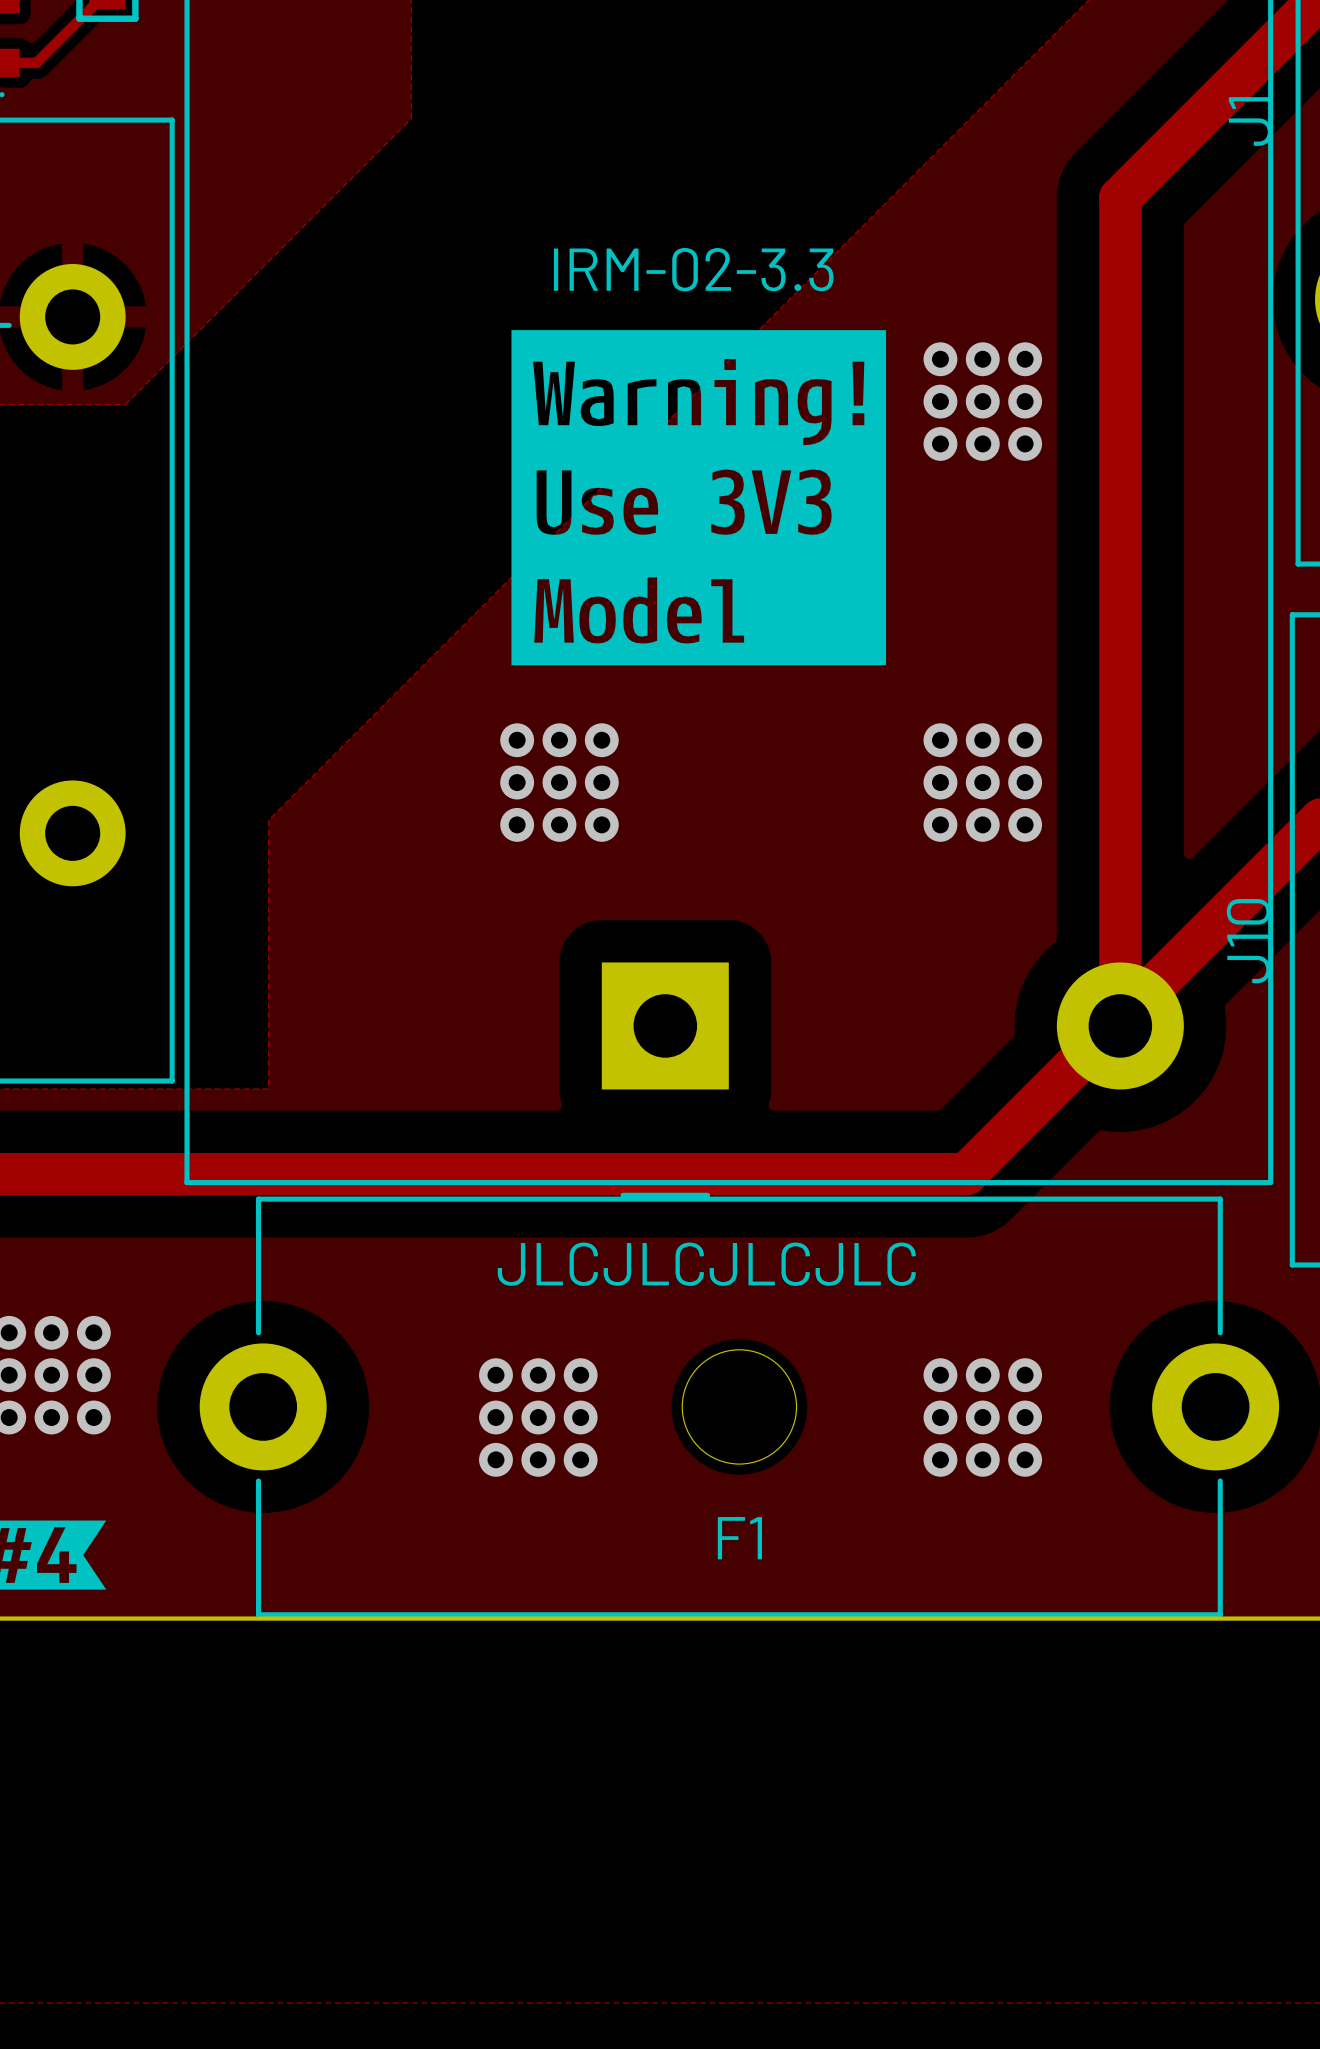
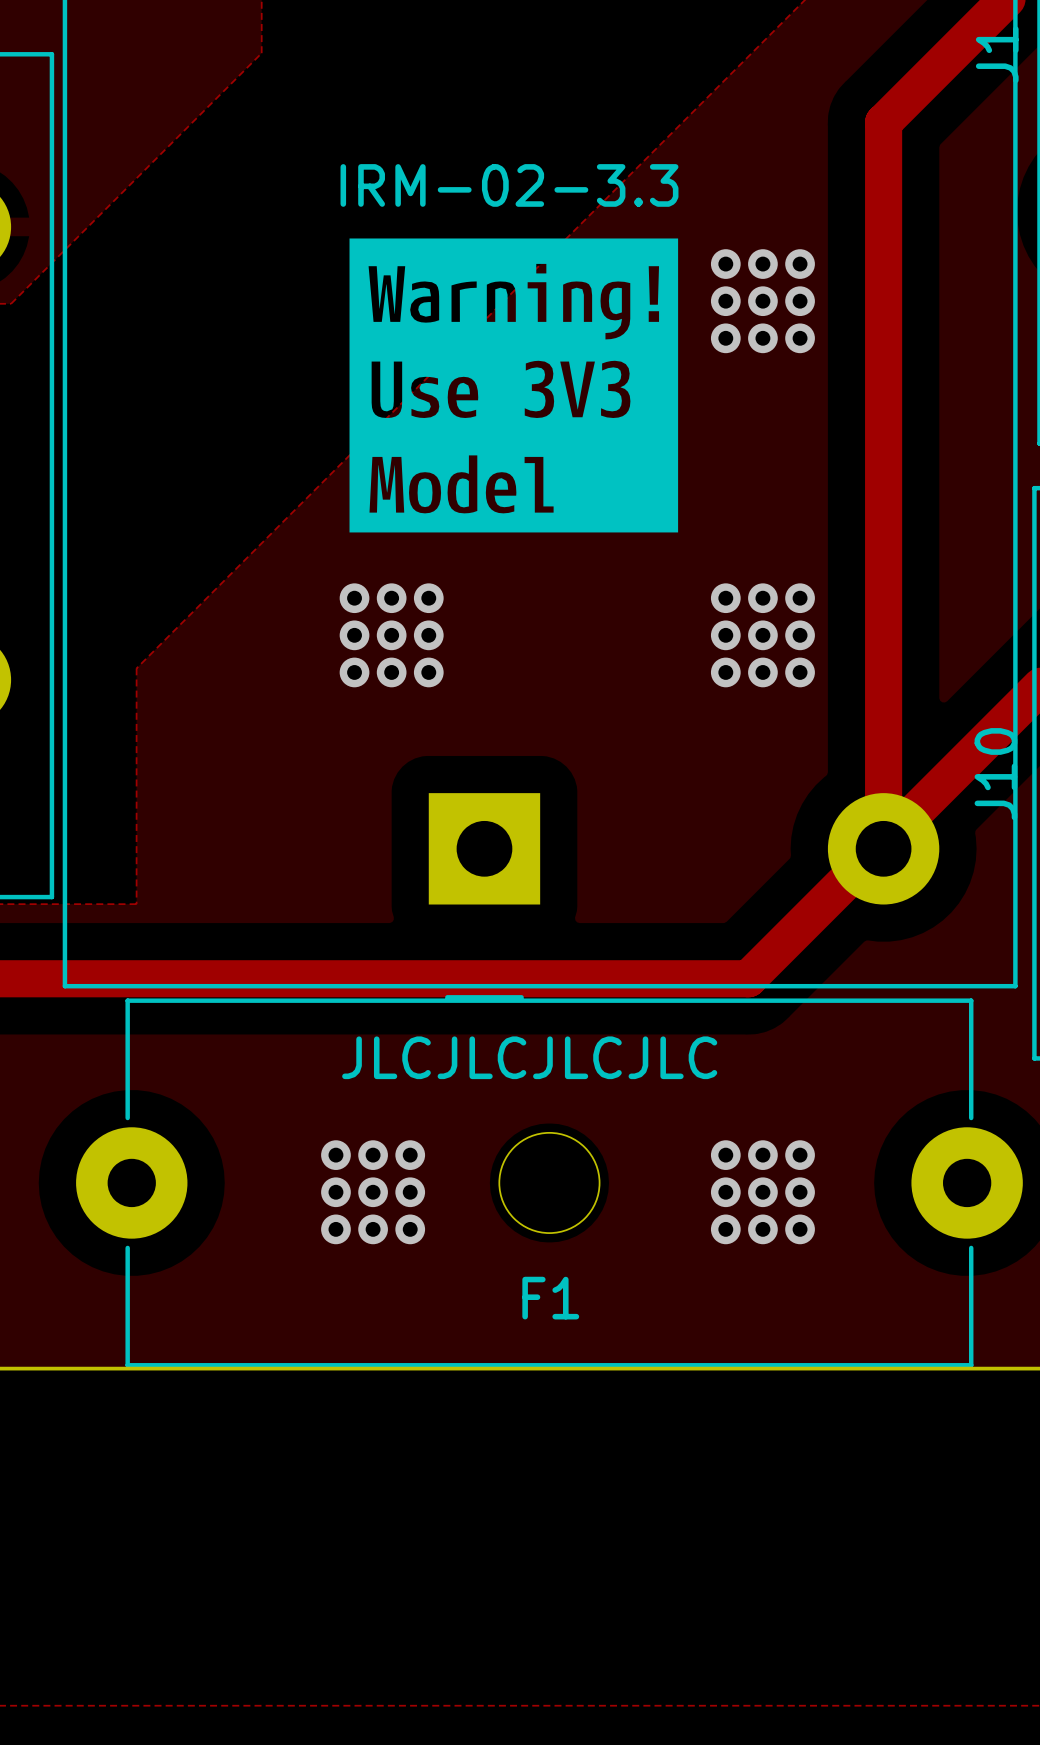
F1 footprint: [199, 1196, 1280, 1618] -> [76, 998, 1023, 1368]

